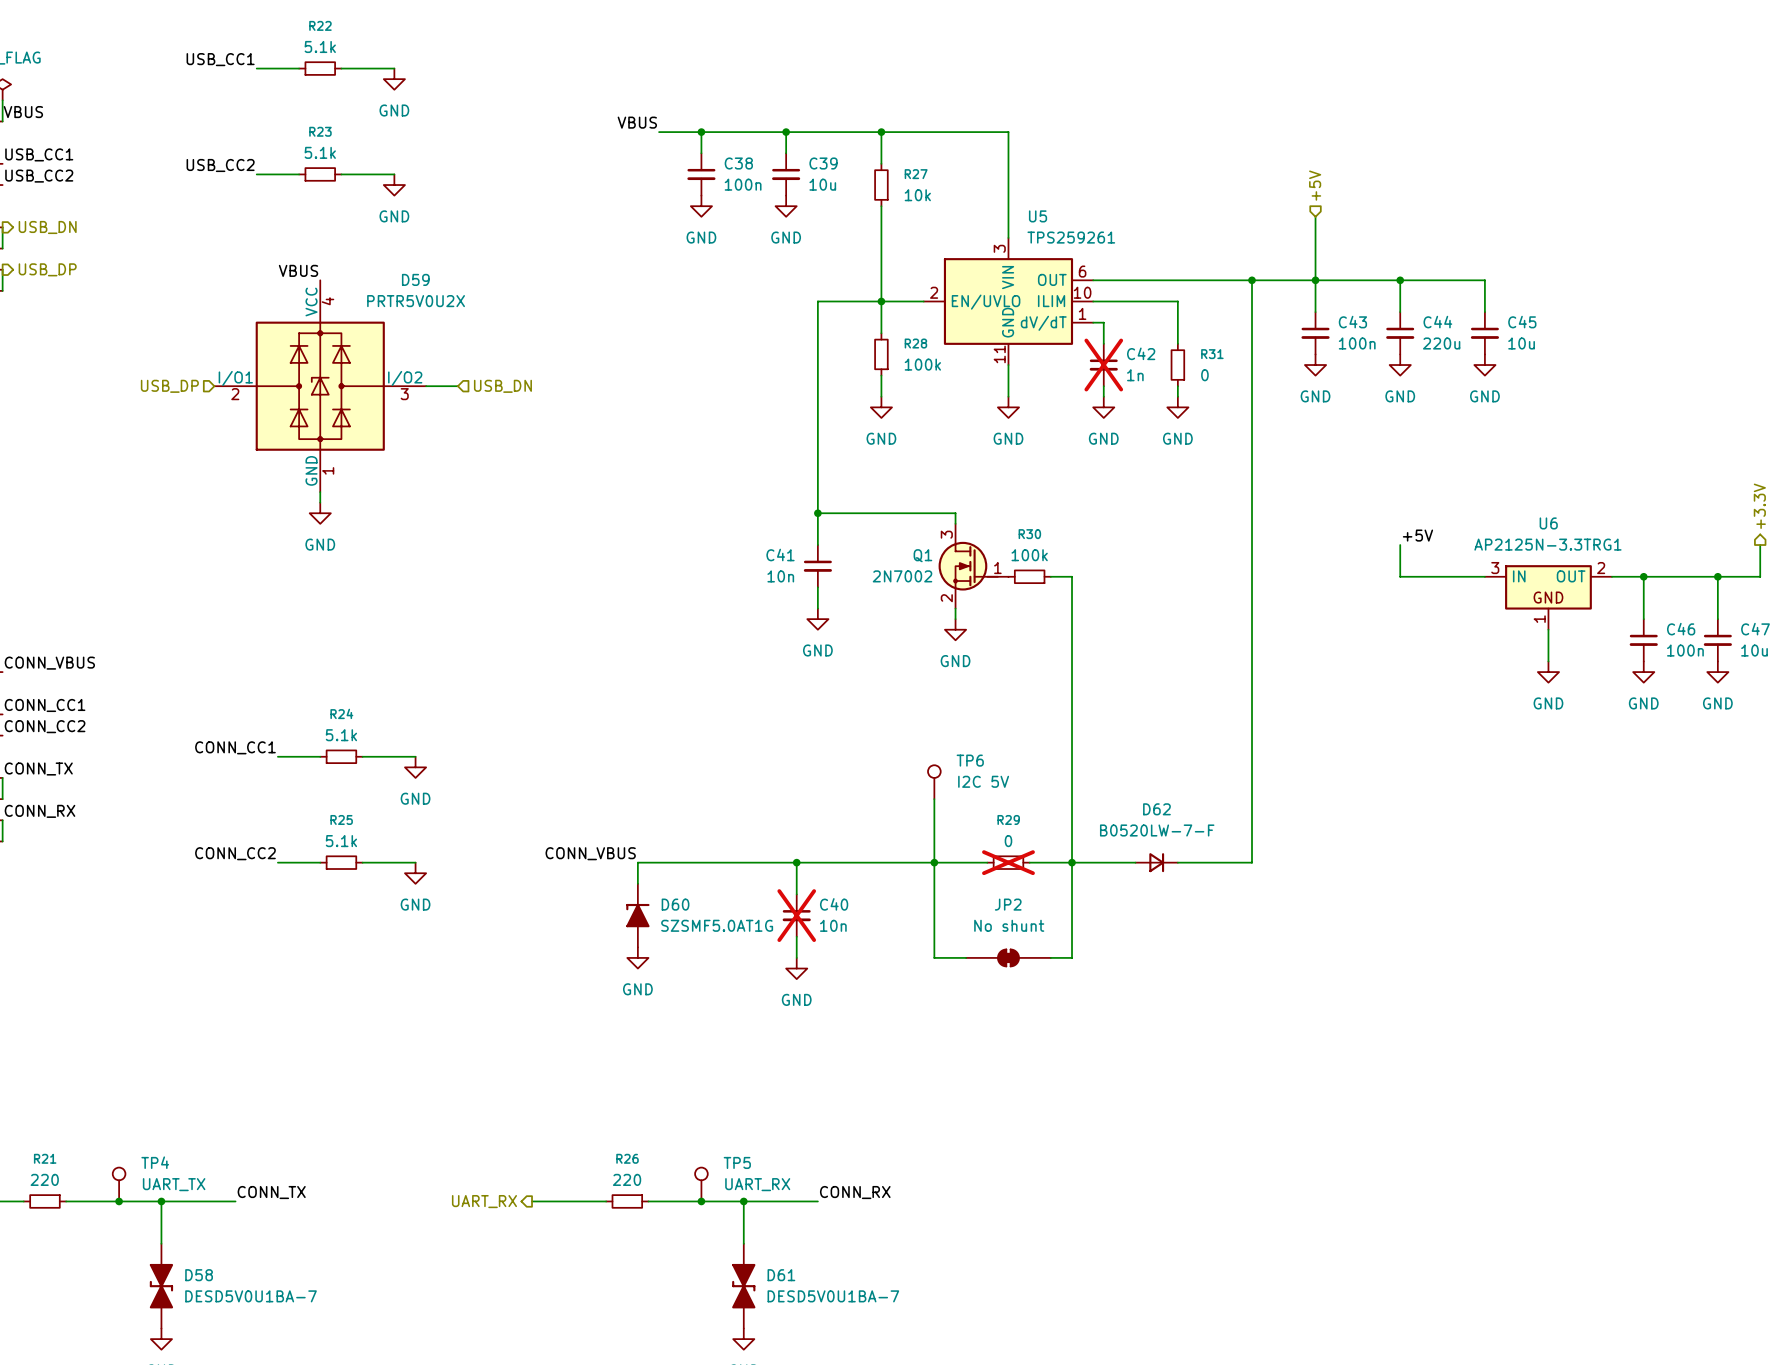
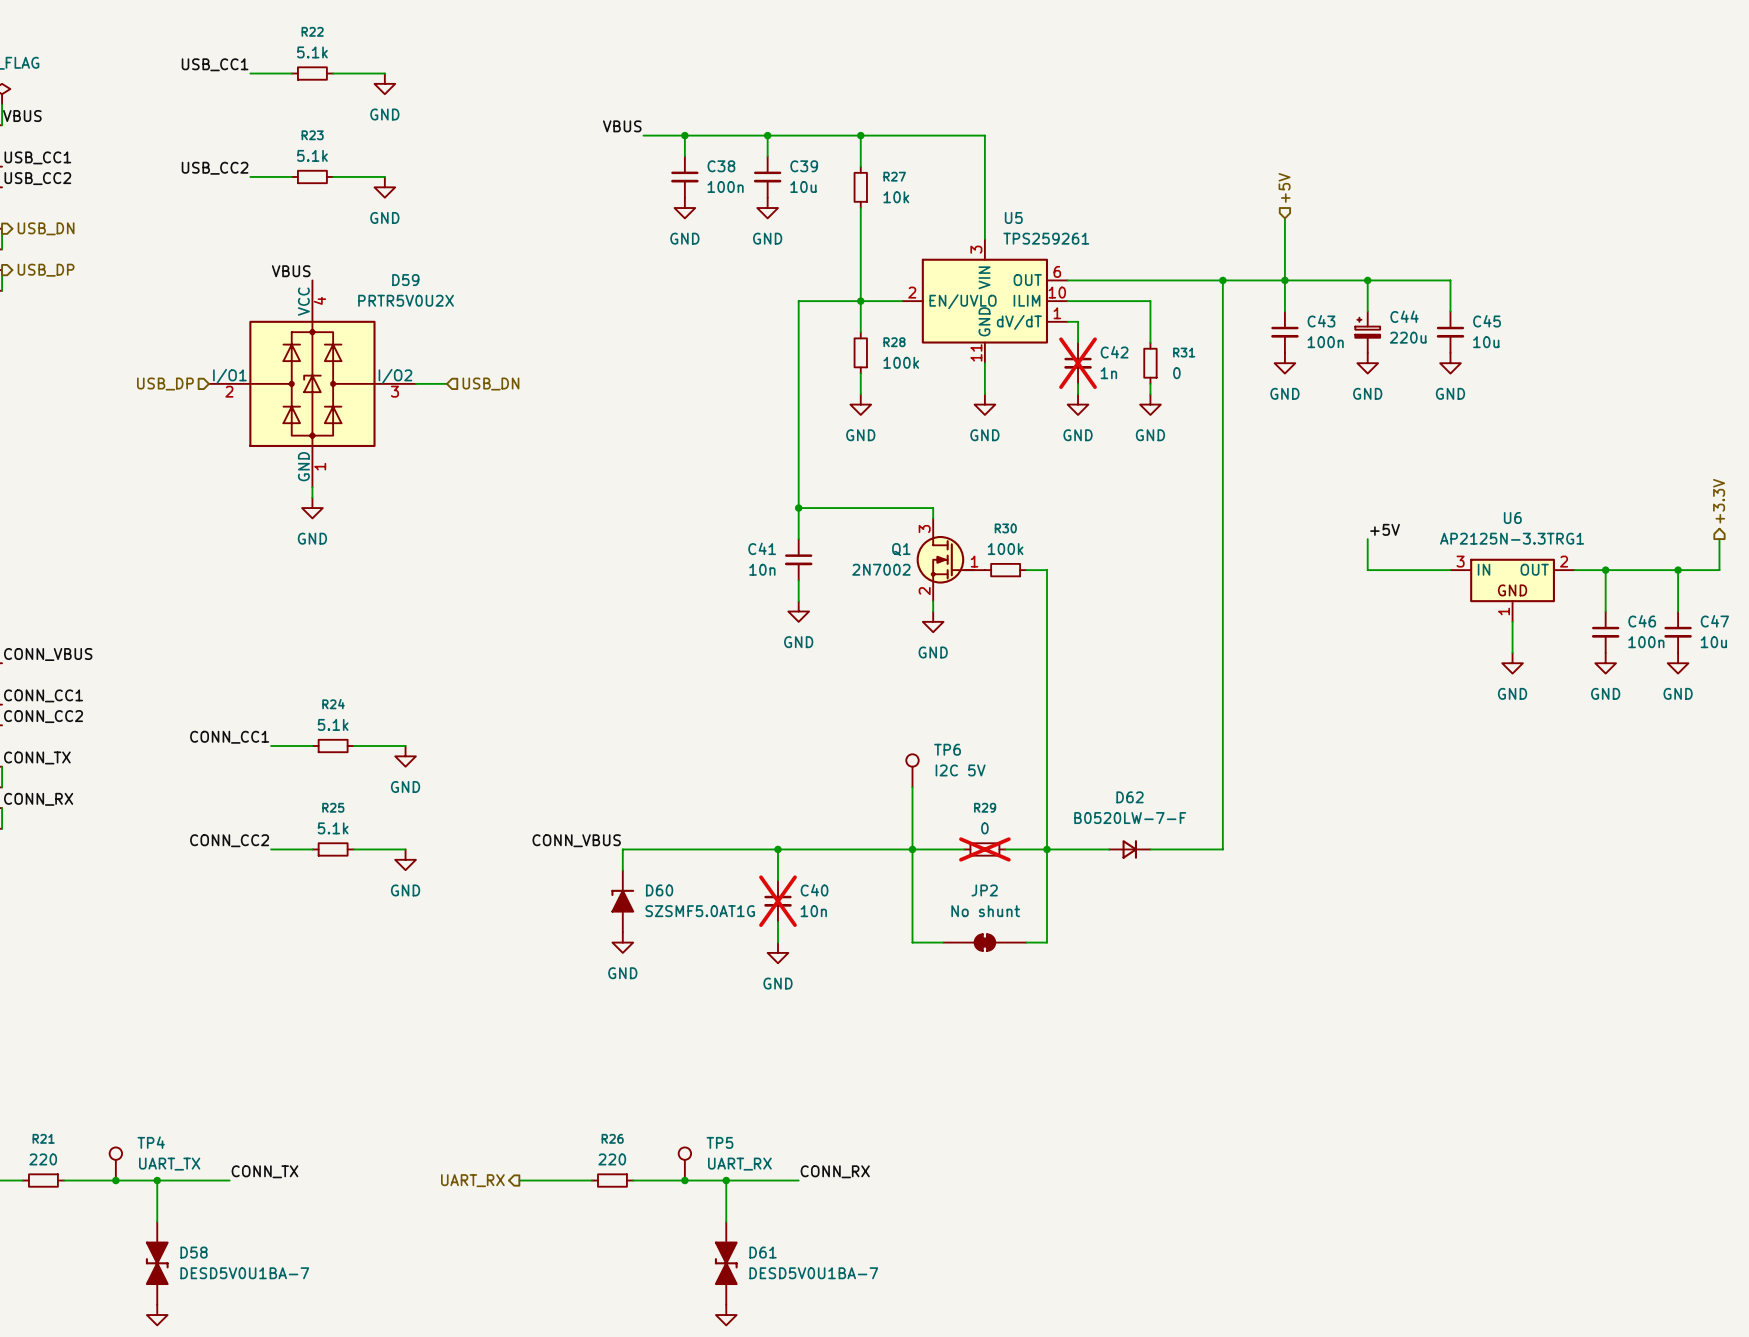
C44 symbol: [1386, 312, 1415, 355] -> [1355, 311, 1381, 353]

